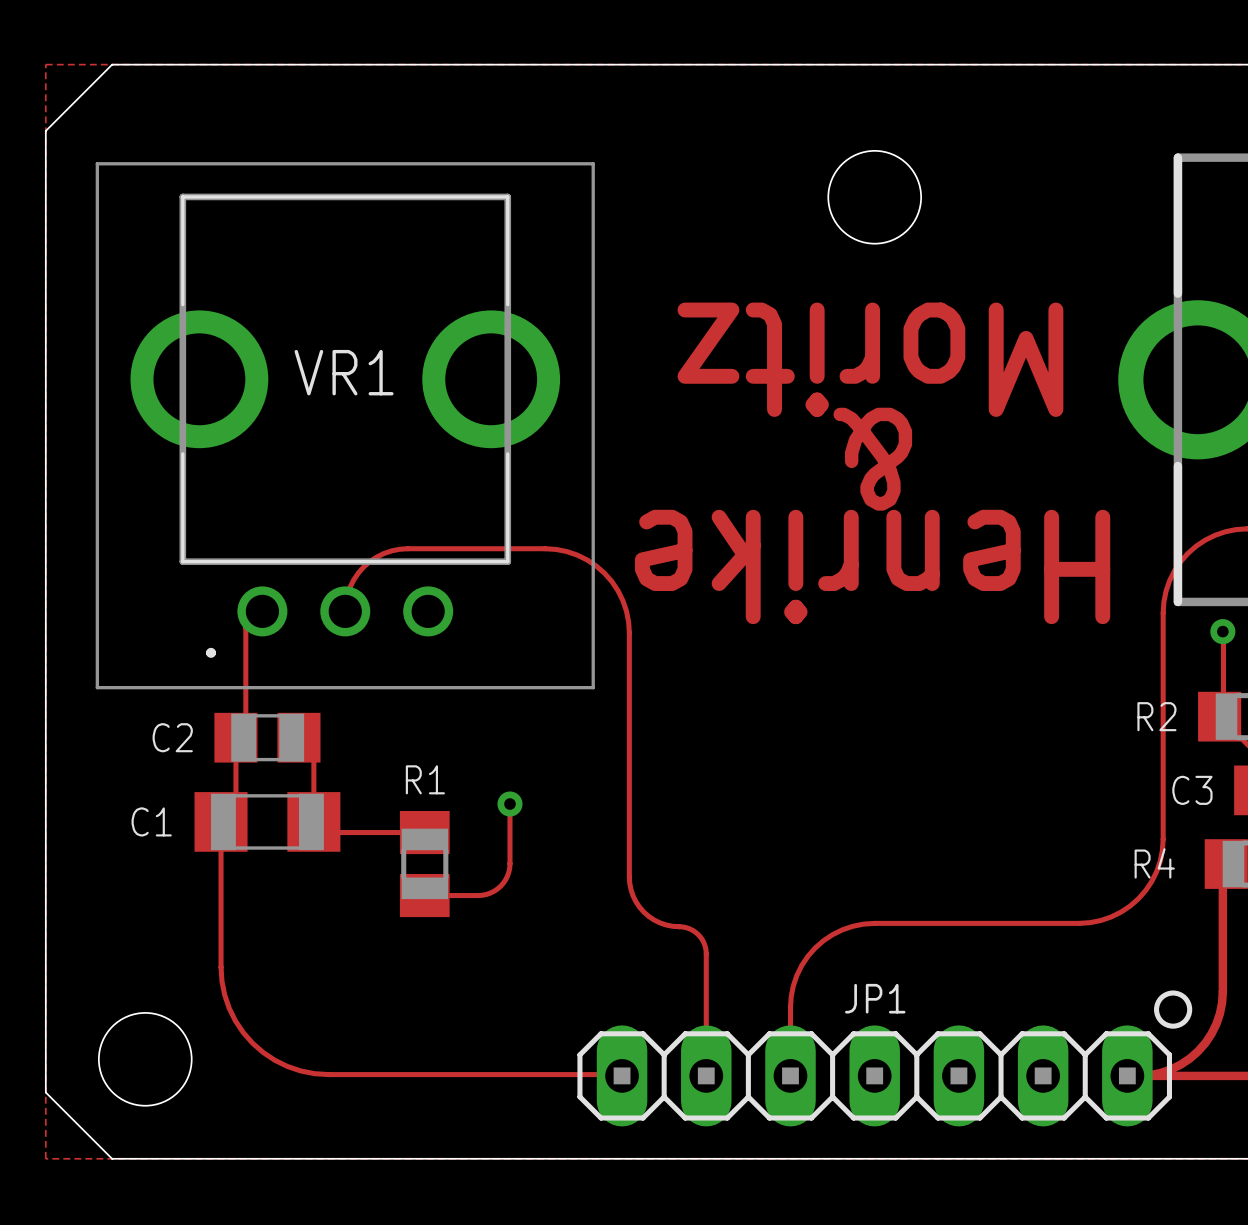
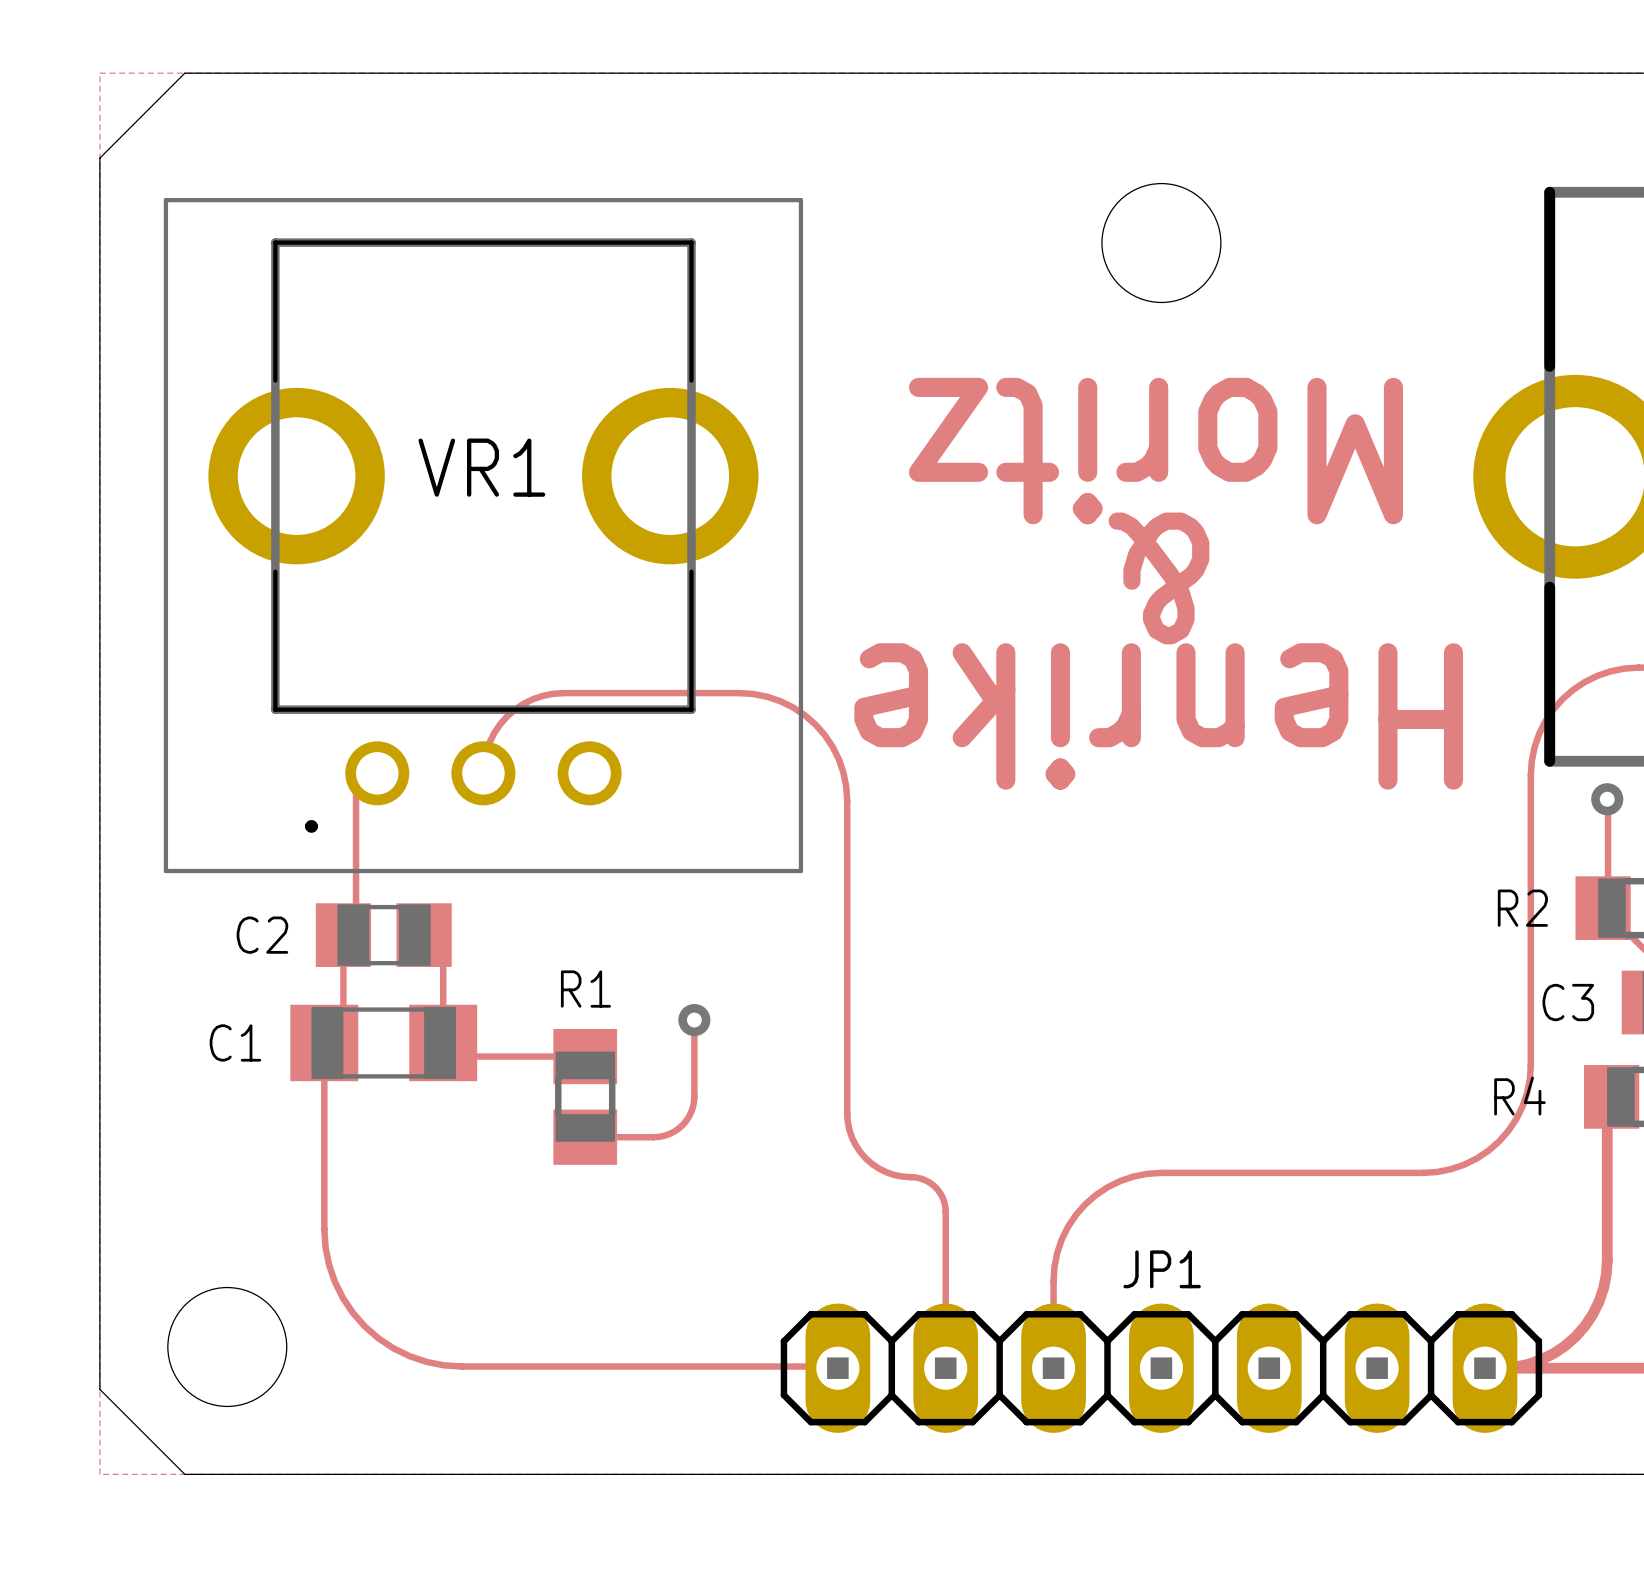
drawing: [1154, 990, 1193, 1029] -> none

